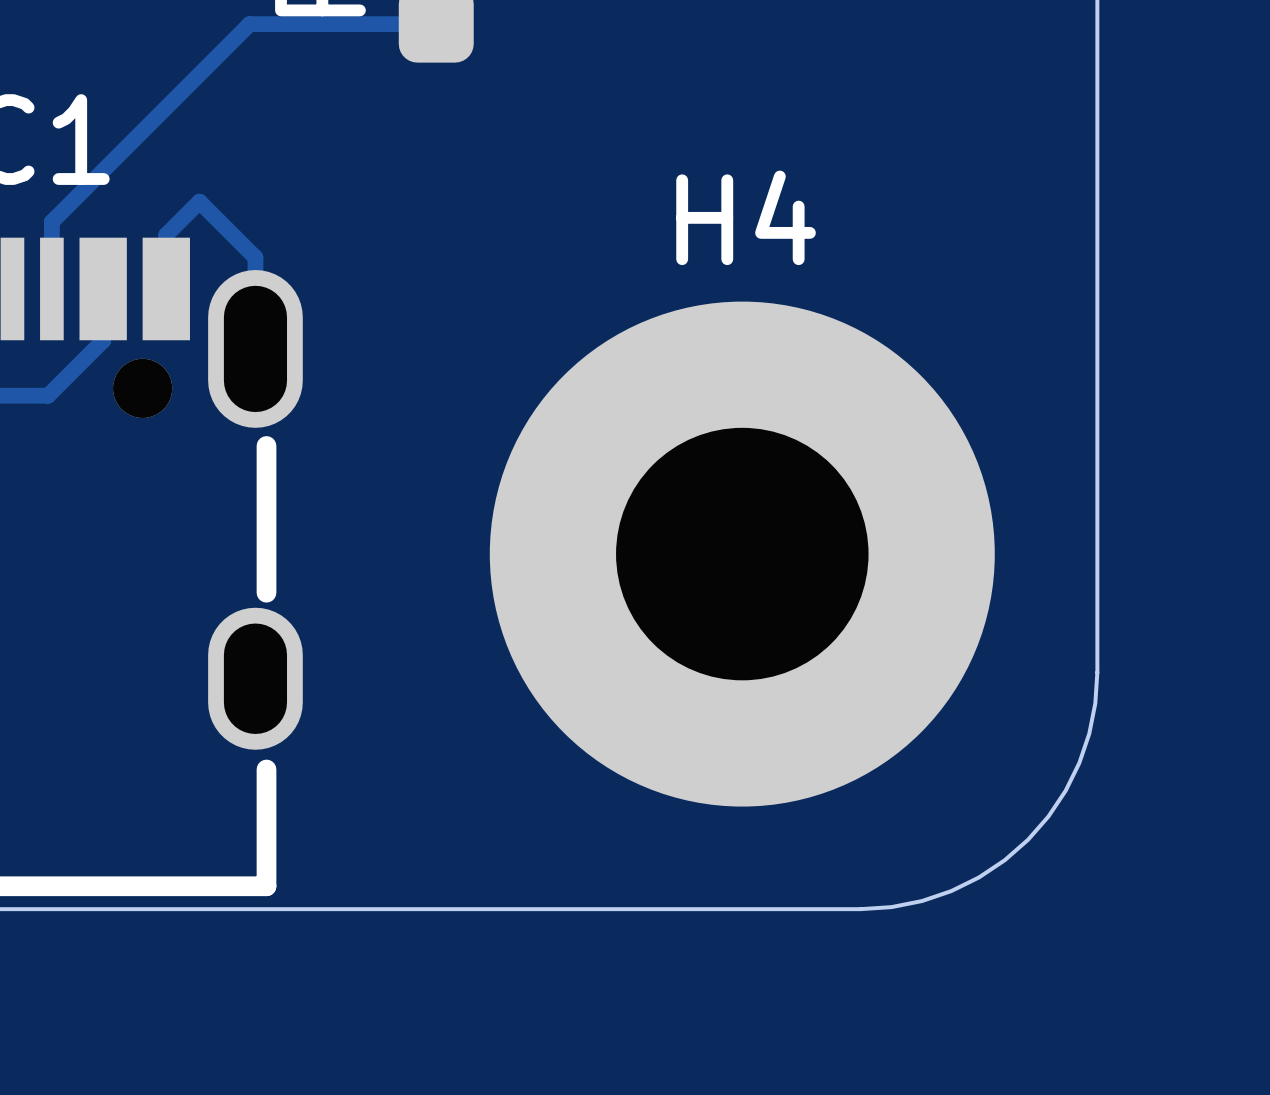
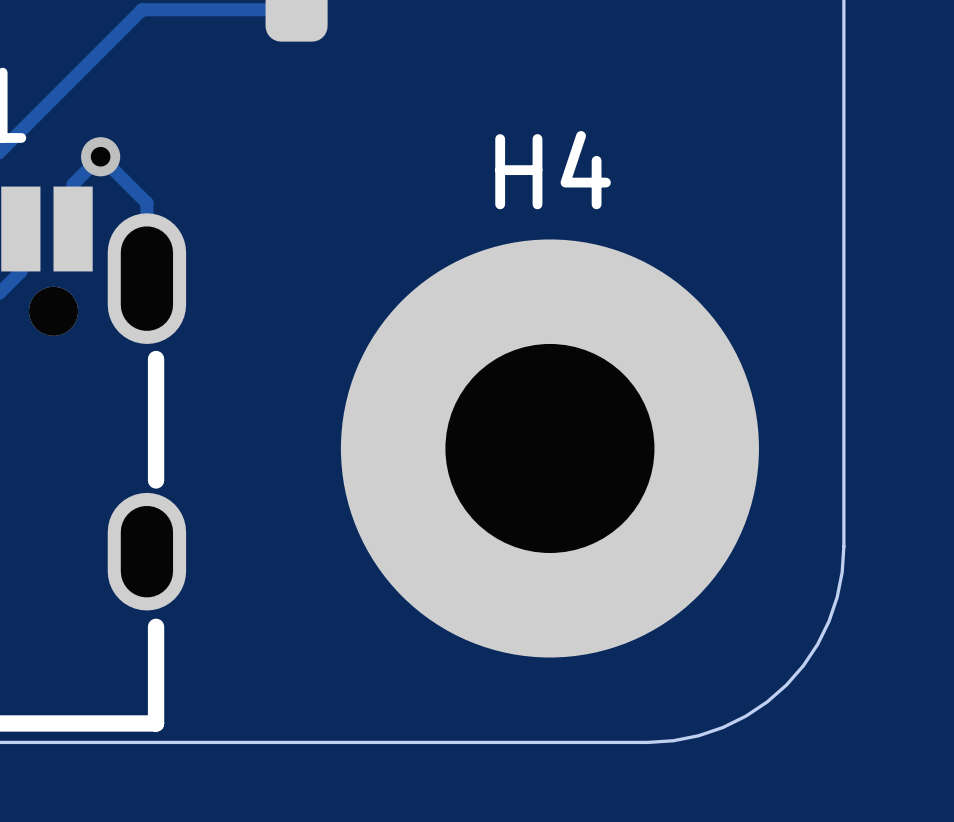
via: none -> (100, 156)

